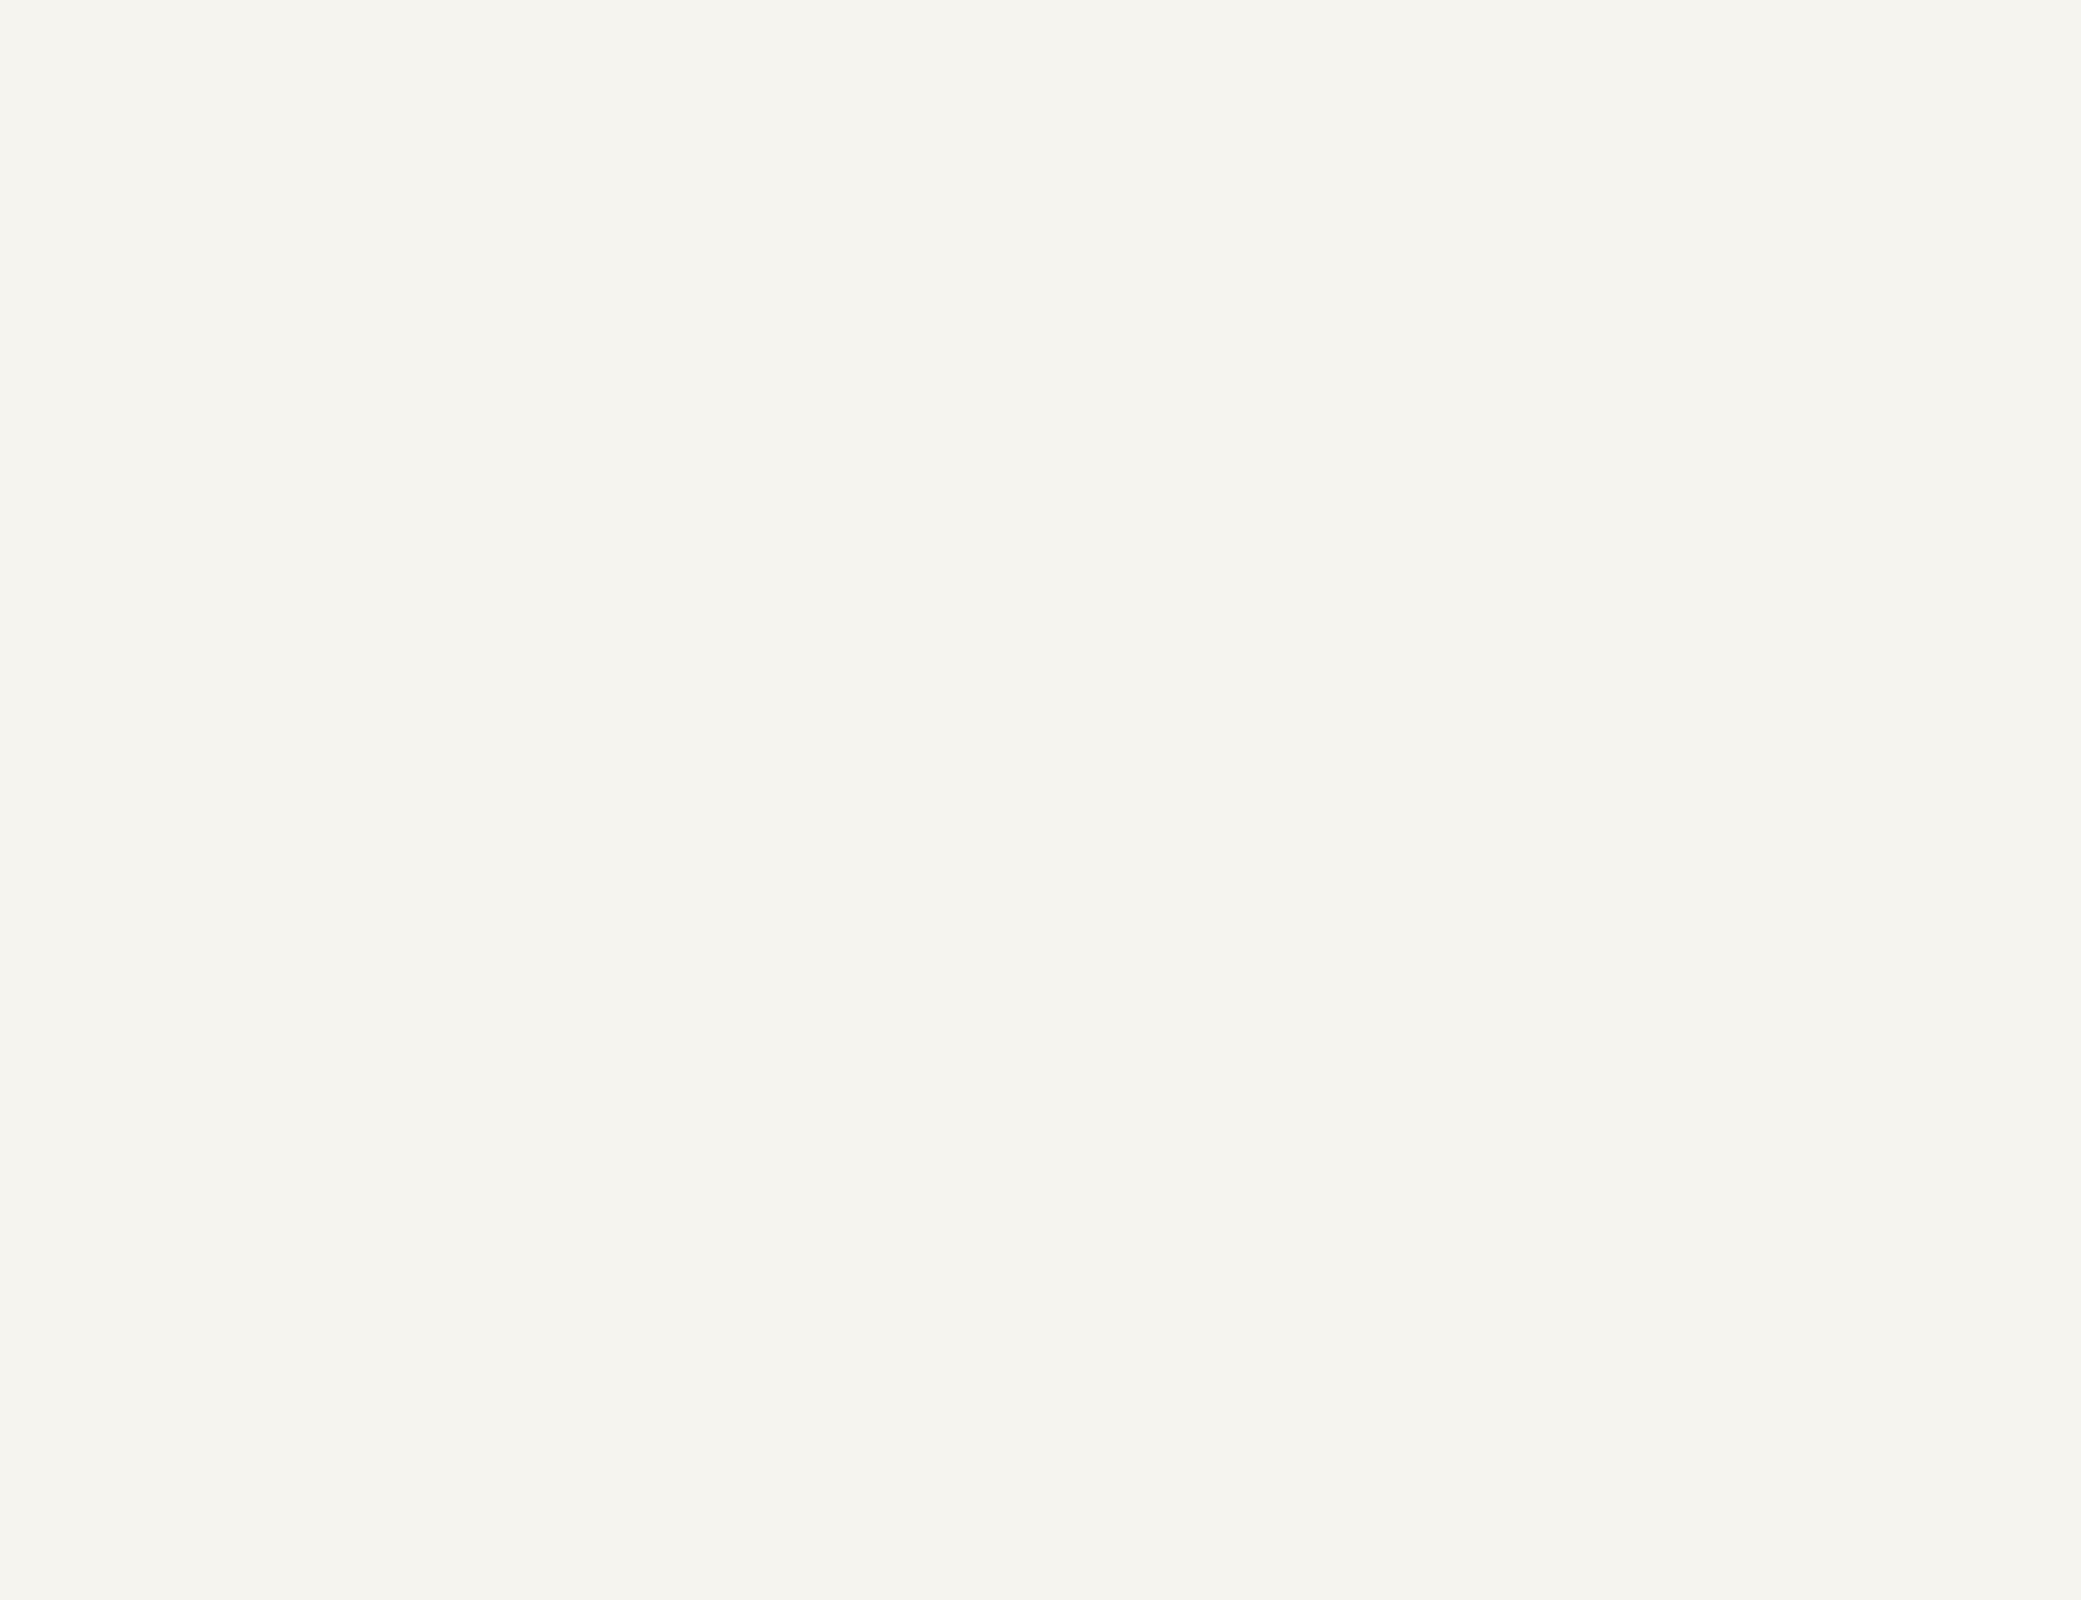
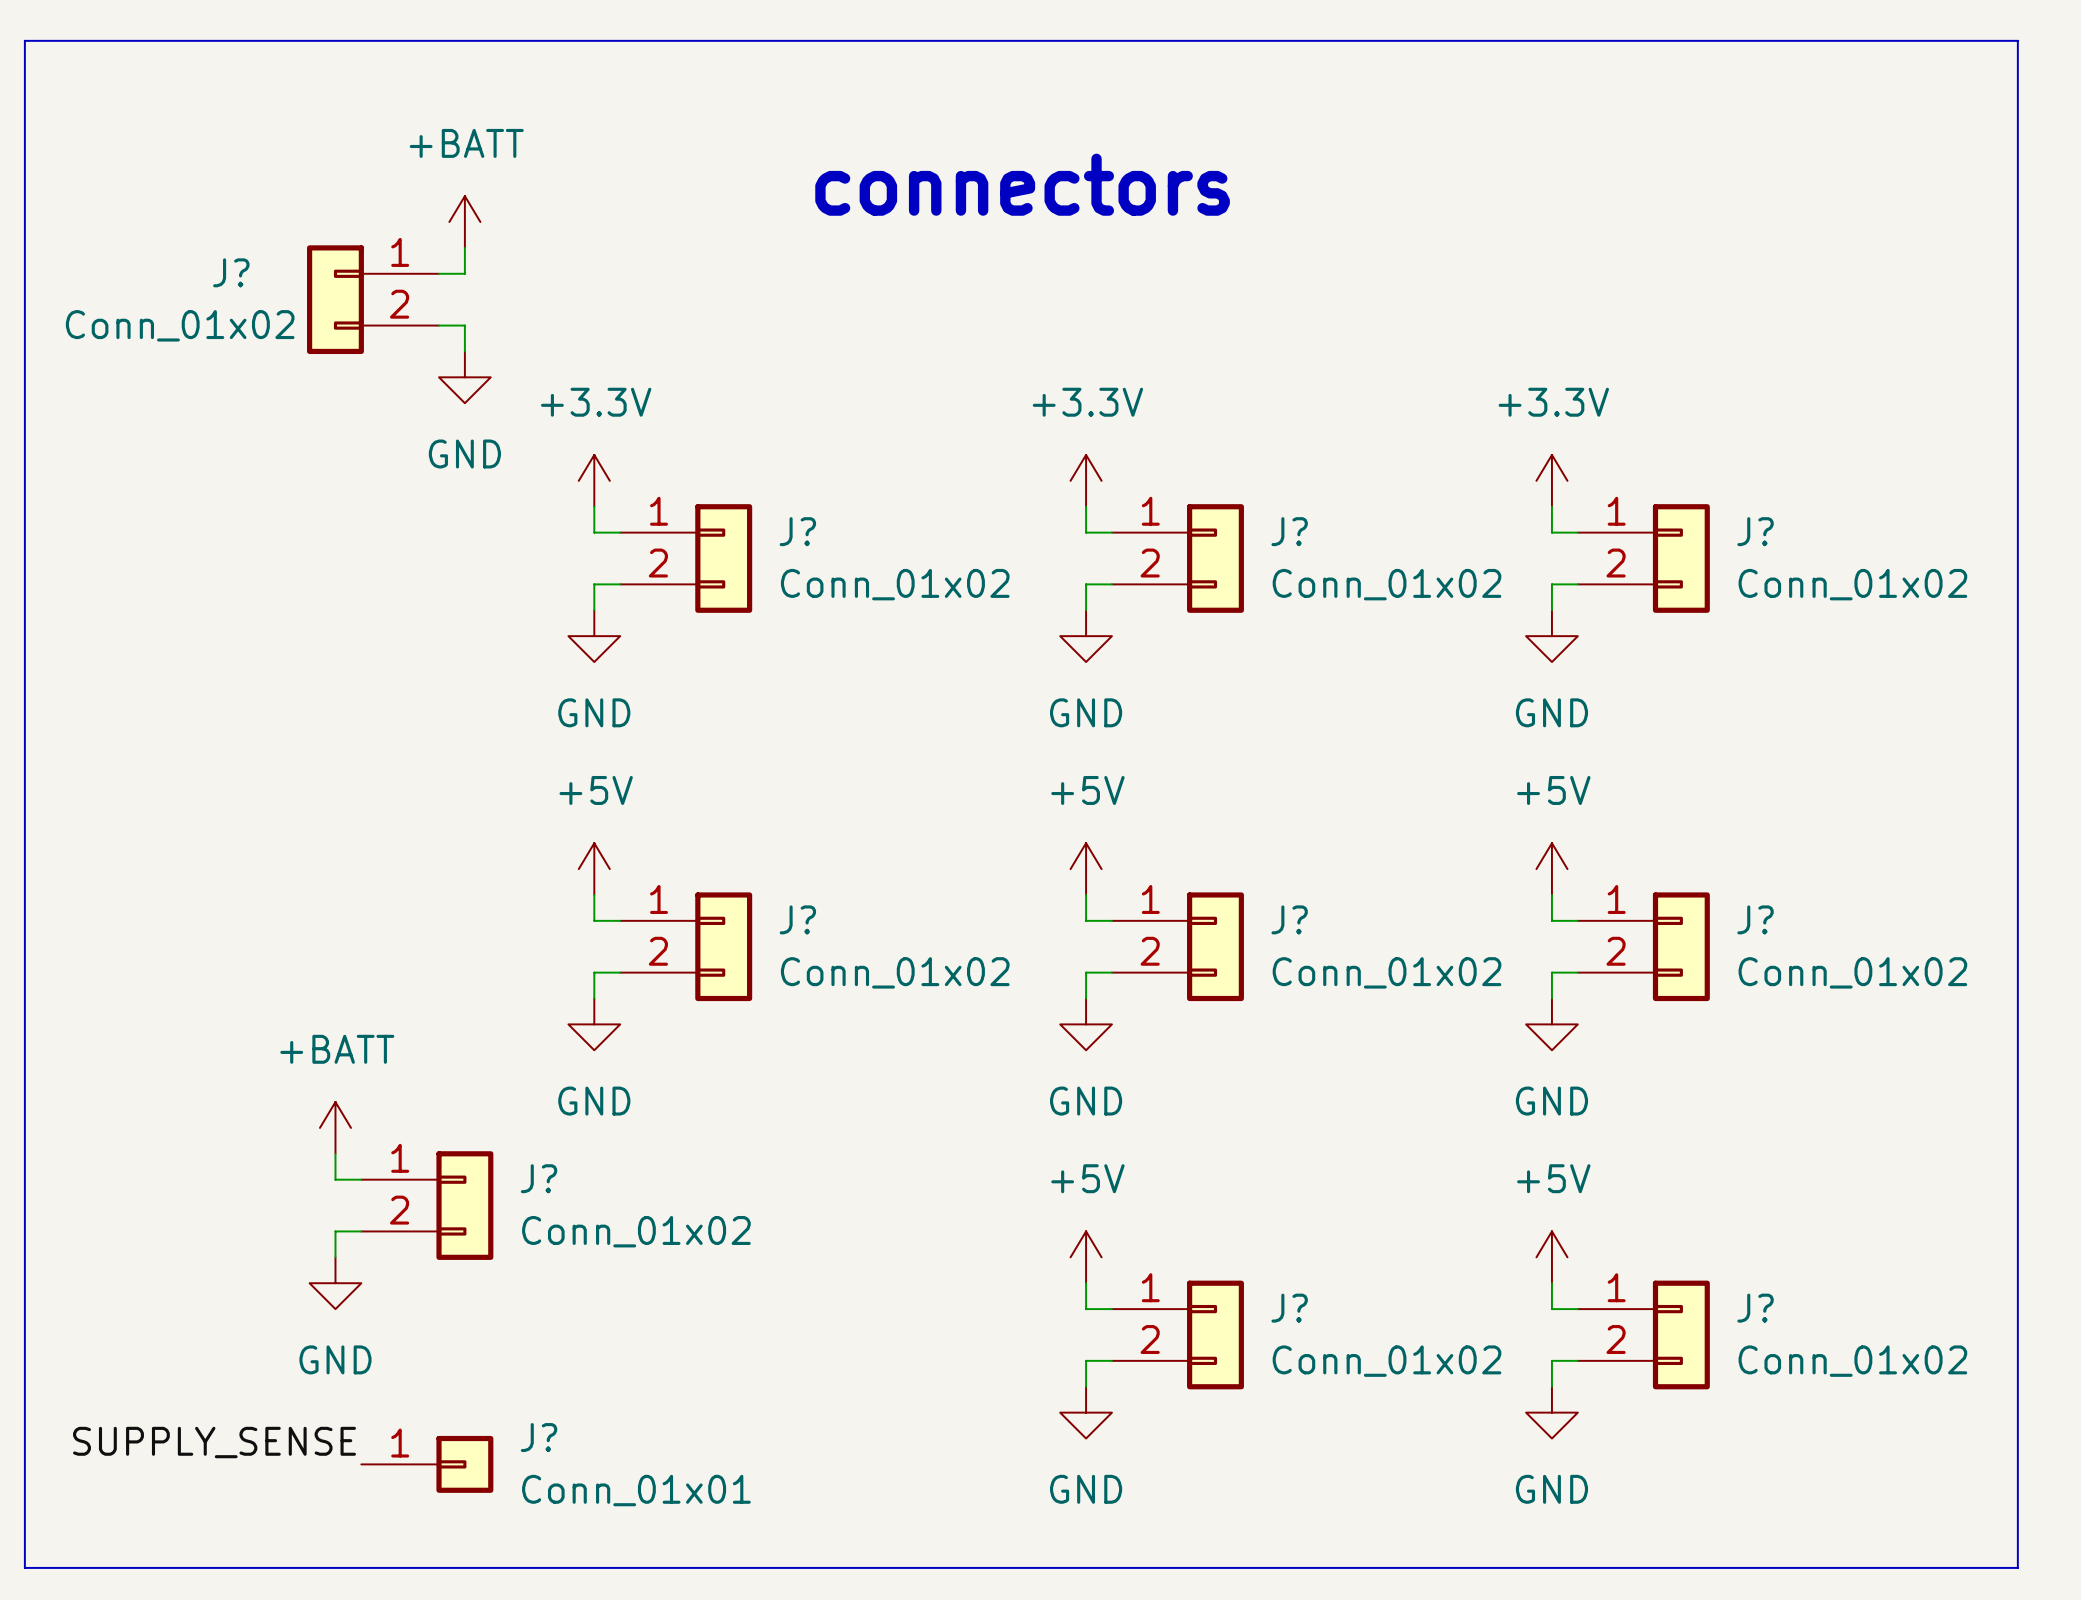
line: none -> (24, 40) (24, 1567) (2017, 1567) (2017, 40) (24, 40)
text: none -> connectors (1022, 184)
power symbol: none -> +BATT (464, 222)
wire: none -> (464, 247) (464, 273) (439, 273)
J?: none -> Conn_01x02 (373, 299)
wire: none -> (439, 325) (464, 325) (464, 351)
power symbol: none -> GND (464, 377)
power symbol: none -> +3.3V (594, 480)
power symbol: none -> +3.3V (1086, 480)
power symbol: none -> +3.3V (1551, 480)
wire: none -> (594, 506) (594, 532) (620, 532)
wire: none -> (1086, 506) (1086, 532) (1111, 532)
wire: none -> (1551, 506) (1551, 532) (1577, 532)
J?: none -> Conn_01x02 (686, 558)
J?: none -> Conn_01x02 (1177, 558)
J?: none -> Conn_01x02 (1643, 558)
wire: none -> (620, 584) (594, 584) (594, 610)
wire: none -> (1111, 584) (1086, 584) (1086, 610)
wire: none -> (1577, 584) (1551, 584) (1551, 610)
power symbol: none -> GND (594, 636)
power symbol: none -> GND (1086, 636)
power symbol: none -> GND (1551, 636)
power symbol: none -> +5V (594, 869)
power symbol: none -> +5V (1086, 869)
power symbol: none -> +5V (1551, 869)
wire: none -> (594, 894) (594, 920) (620, 920)
wire: none -> (1086, 894) (1086, 920) (1111, 920)
wire: none -> (1551, 894) (1551, 920) (1577, 920)
J?: none -> Conn_01x02 (686, 946)
J?: none -> Conn_01x02 (1177, 946)
J?: none -> Conn_01x02 (1643, 946)
wire: none -> (620, 972) (594, 972) (594, 998)
wire: none -> (1111, 972) (1086, 972) (1086, 998)
wire: none -> (1577, 972) (1551, 972) (1551, 998)
power symbol: none -> GND (594, 1024)
power symbol: none -> GND (1086, 1024)
power symbol: none -> GND (1551, 1024)
power symbol: none -> +BATT (335, 1127)
wire: none -> (335, 1153) (335, 1179) (361, 1179)
J?: none -> Conn_01x02 (427, 1205)
wire: none -> (361, 1231) (335, 1231) (335, 1257)
power symbol: none -> +5V (1086, 1257)
power symbol: none -> +5V (1551, 1257)
power symbol: none -> GND (335, 1283)
wire: none -> (1086, 1283) (1086, 1309) (1111, 1309)
wire: none -> (1551, 1283) (1551, 1309) (1577, 1309)
J?: none -> Conn_01x02 (1177, 1334)
J?: none -> Conn_01x02 (1643, 1334)
wire: none -> (1111, 1360) (1086, 1360) (1086, 1386)
wire: none -> (1577, 1360) (1551, 1360) (1551, 1386)
power symbol: none -> GND (1086, 1412)
power symbol: none -> GND (1551, 1412)
label: none -> SUPPLY_SENSE (214, 1442)
J?: none -> Conn_01x01 (427, 1464)

